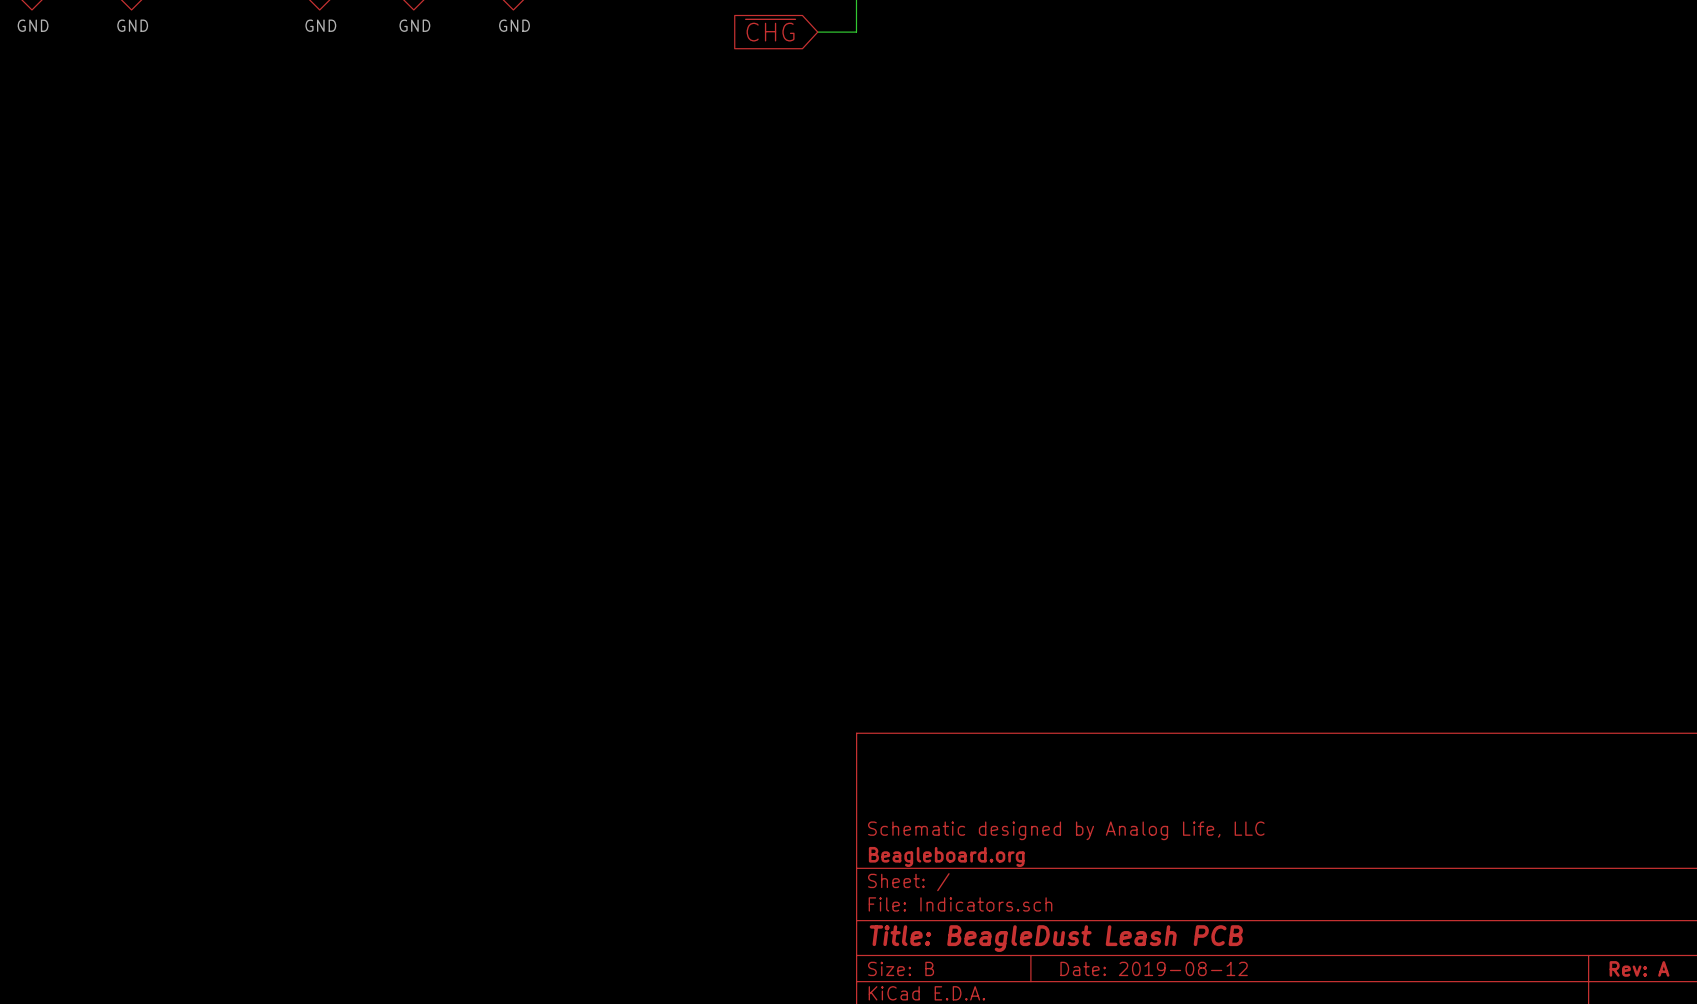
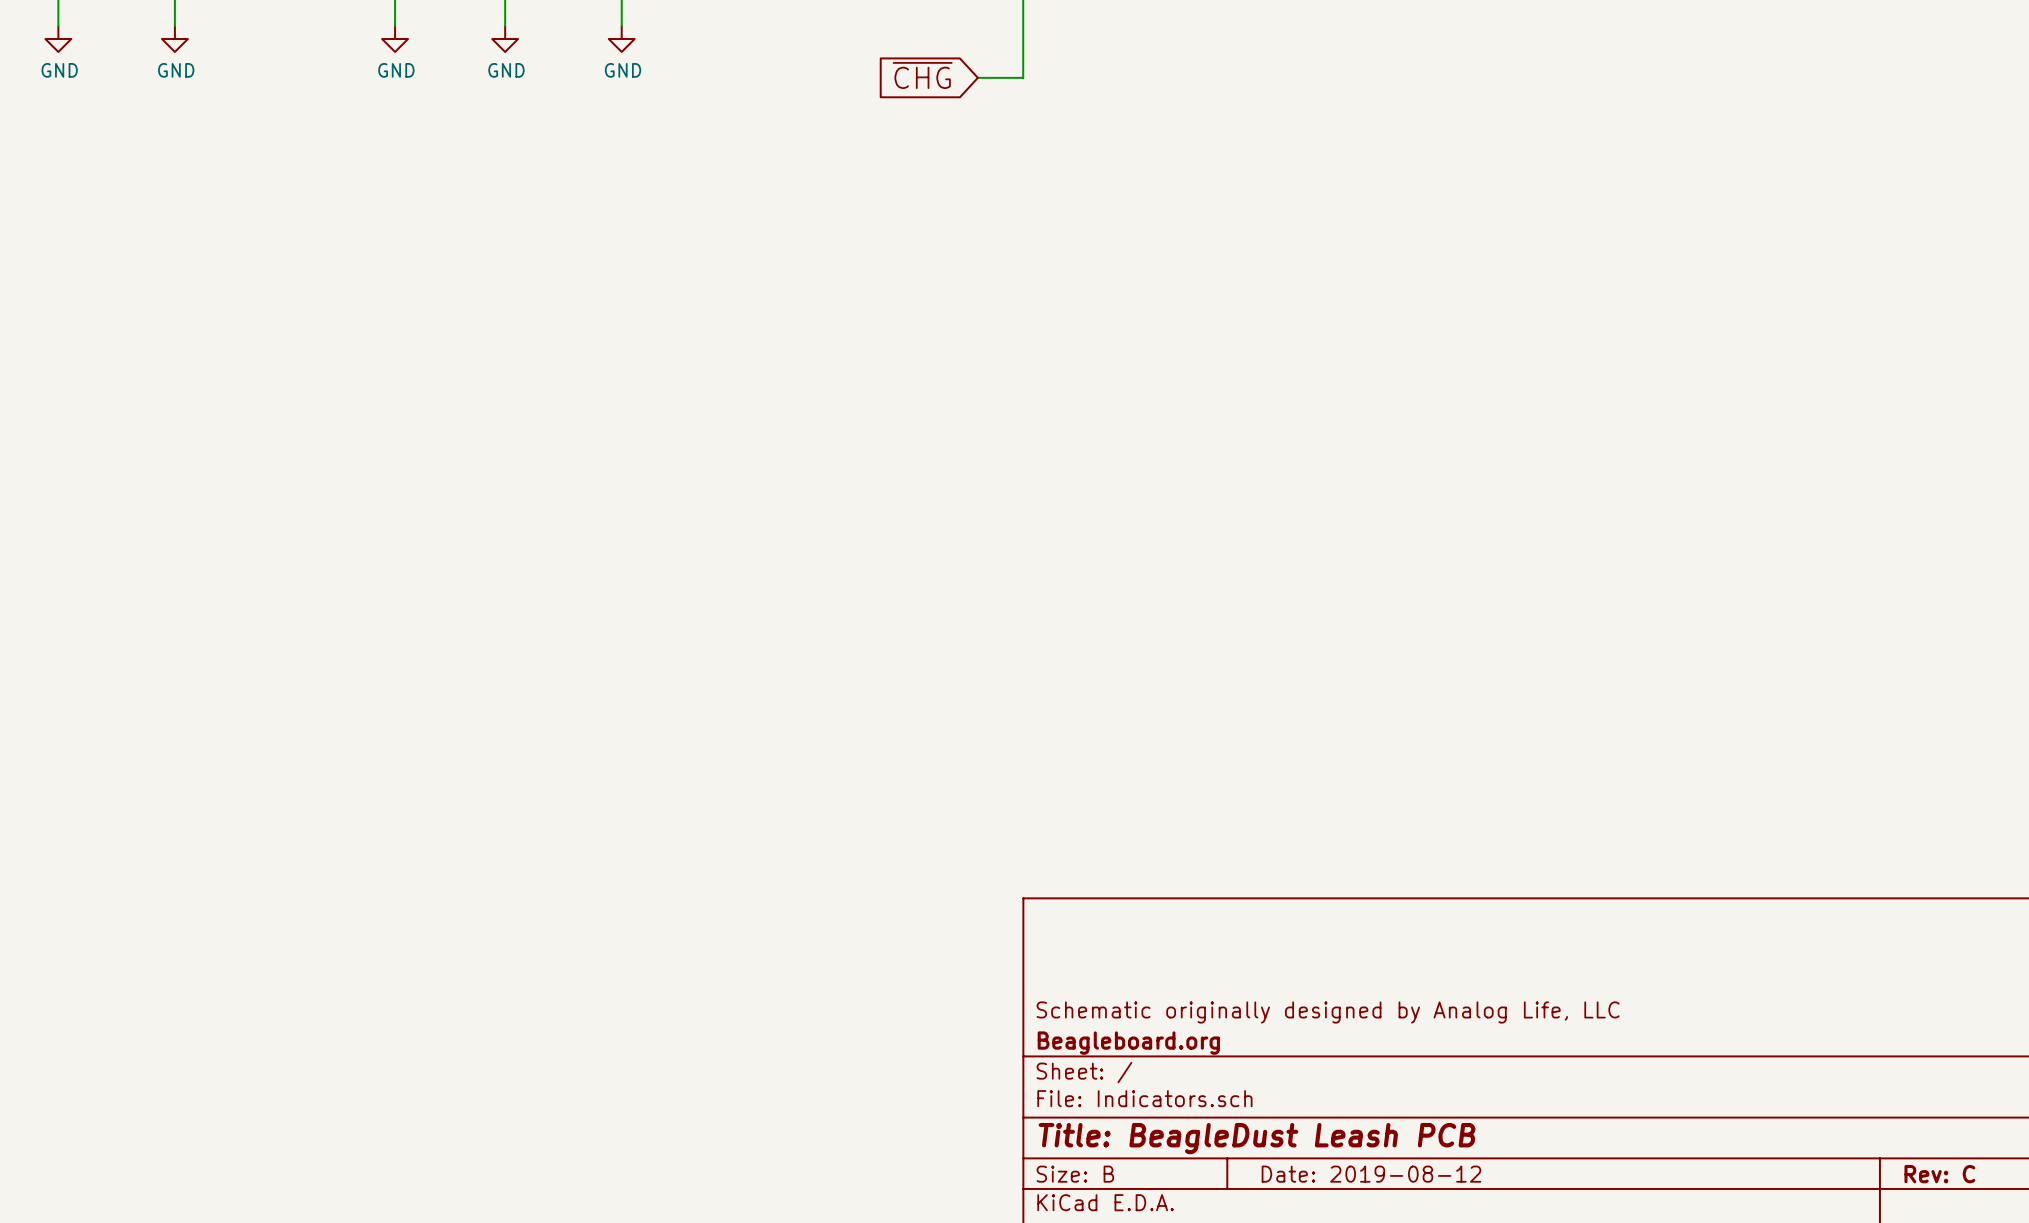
title block: Schematic designed by Analog Life, LLC (1066, 830) -> Schematic originally designed by Analog Life, LLC (1328, 1012)
title block: Rev: A (1639, 968) -> Rev: C (1939, 1174)

